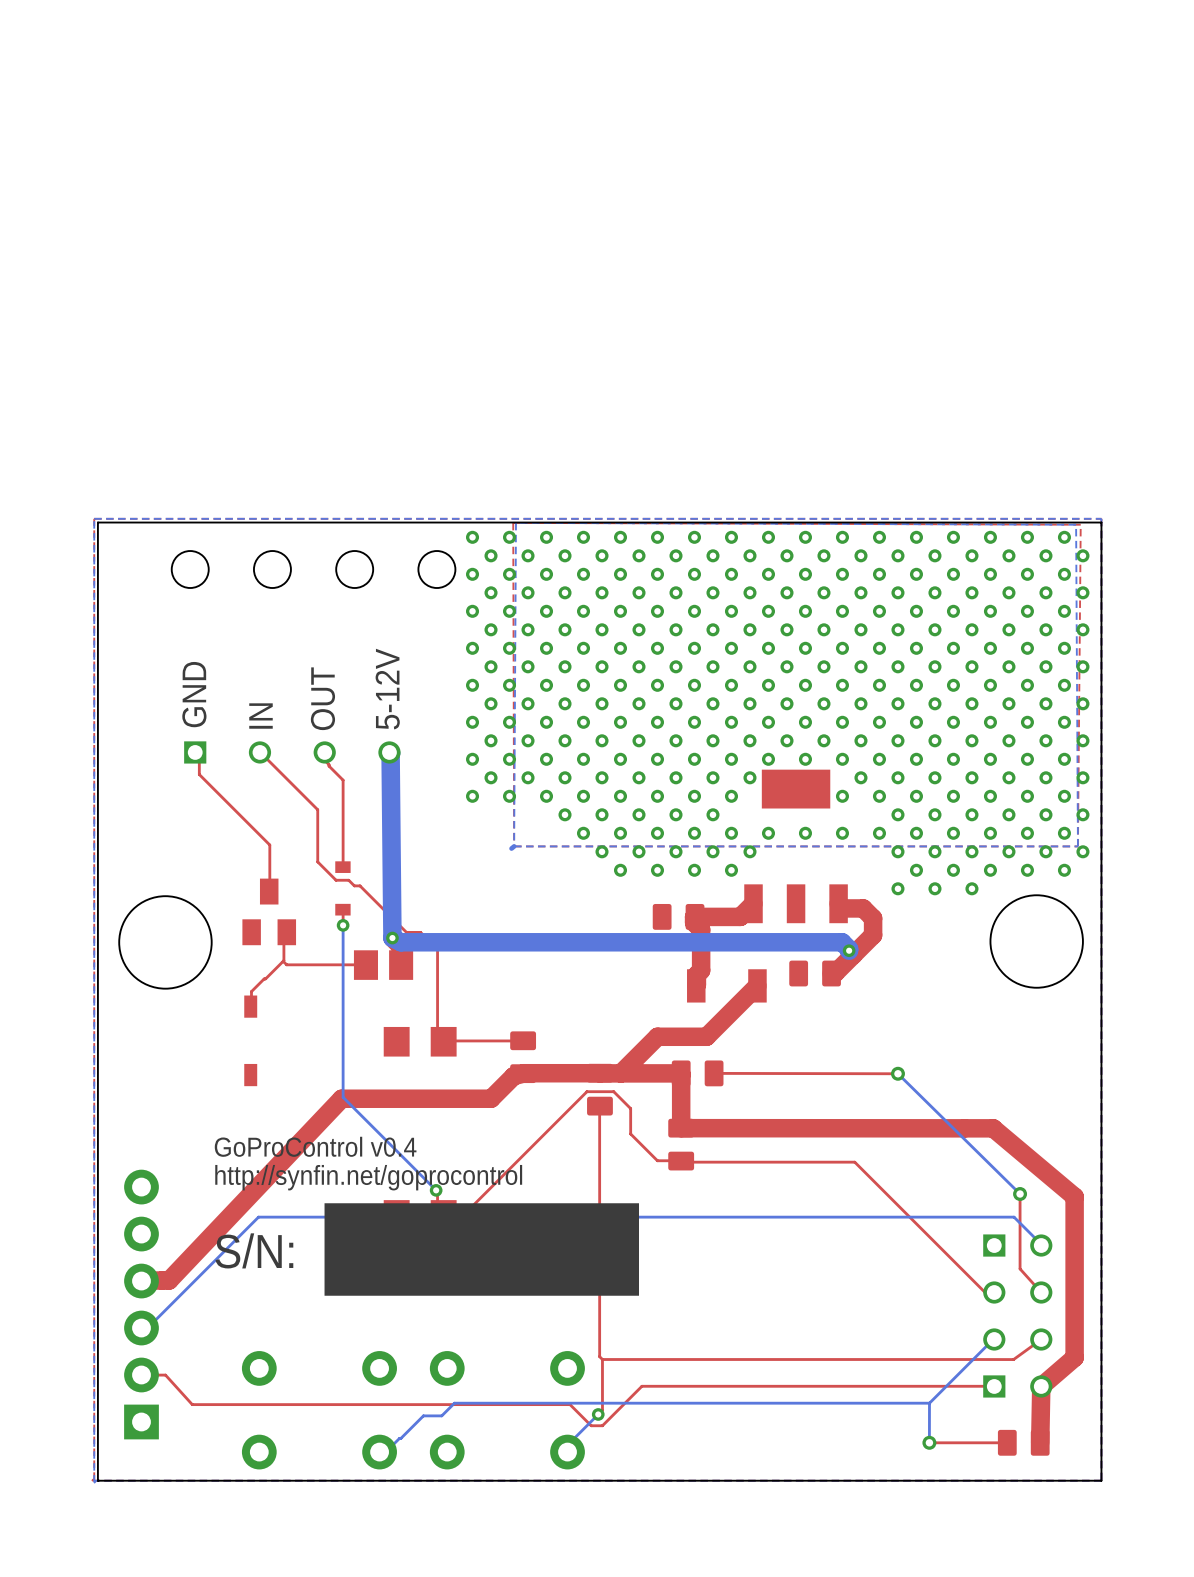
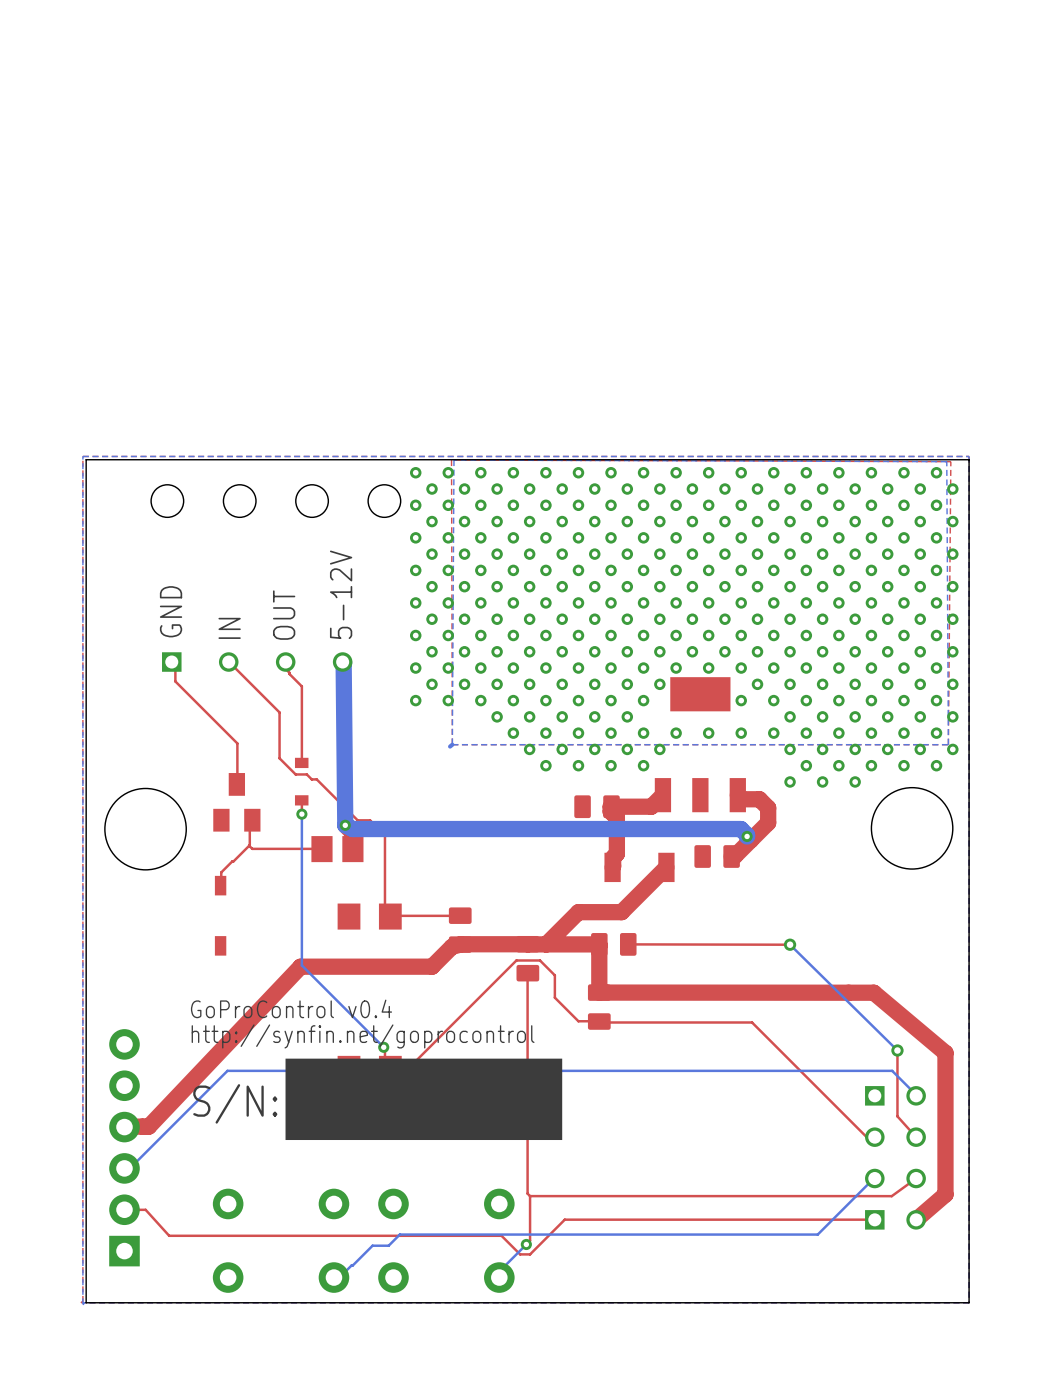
top track: (1041, 1386) (1040, 1442) -> none
bottom track: (929, 1403) (929, 1442) -> none
via: (929, 1442) -> none
top track: (1007, 1442) (929, 1442) -> none
part: (1023, 1442) -> none

